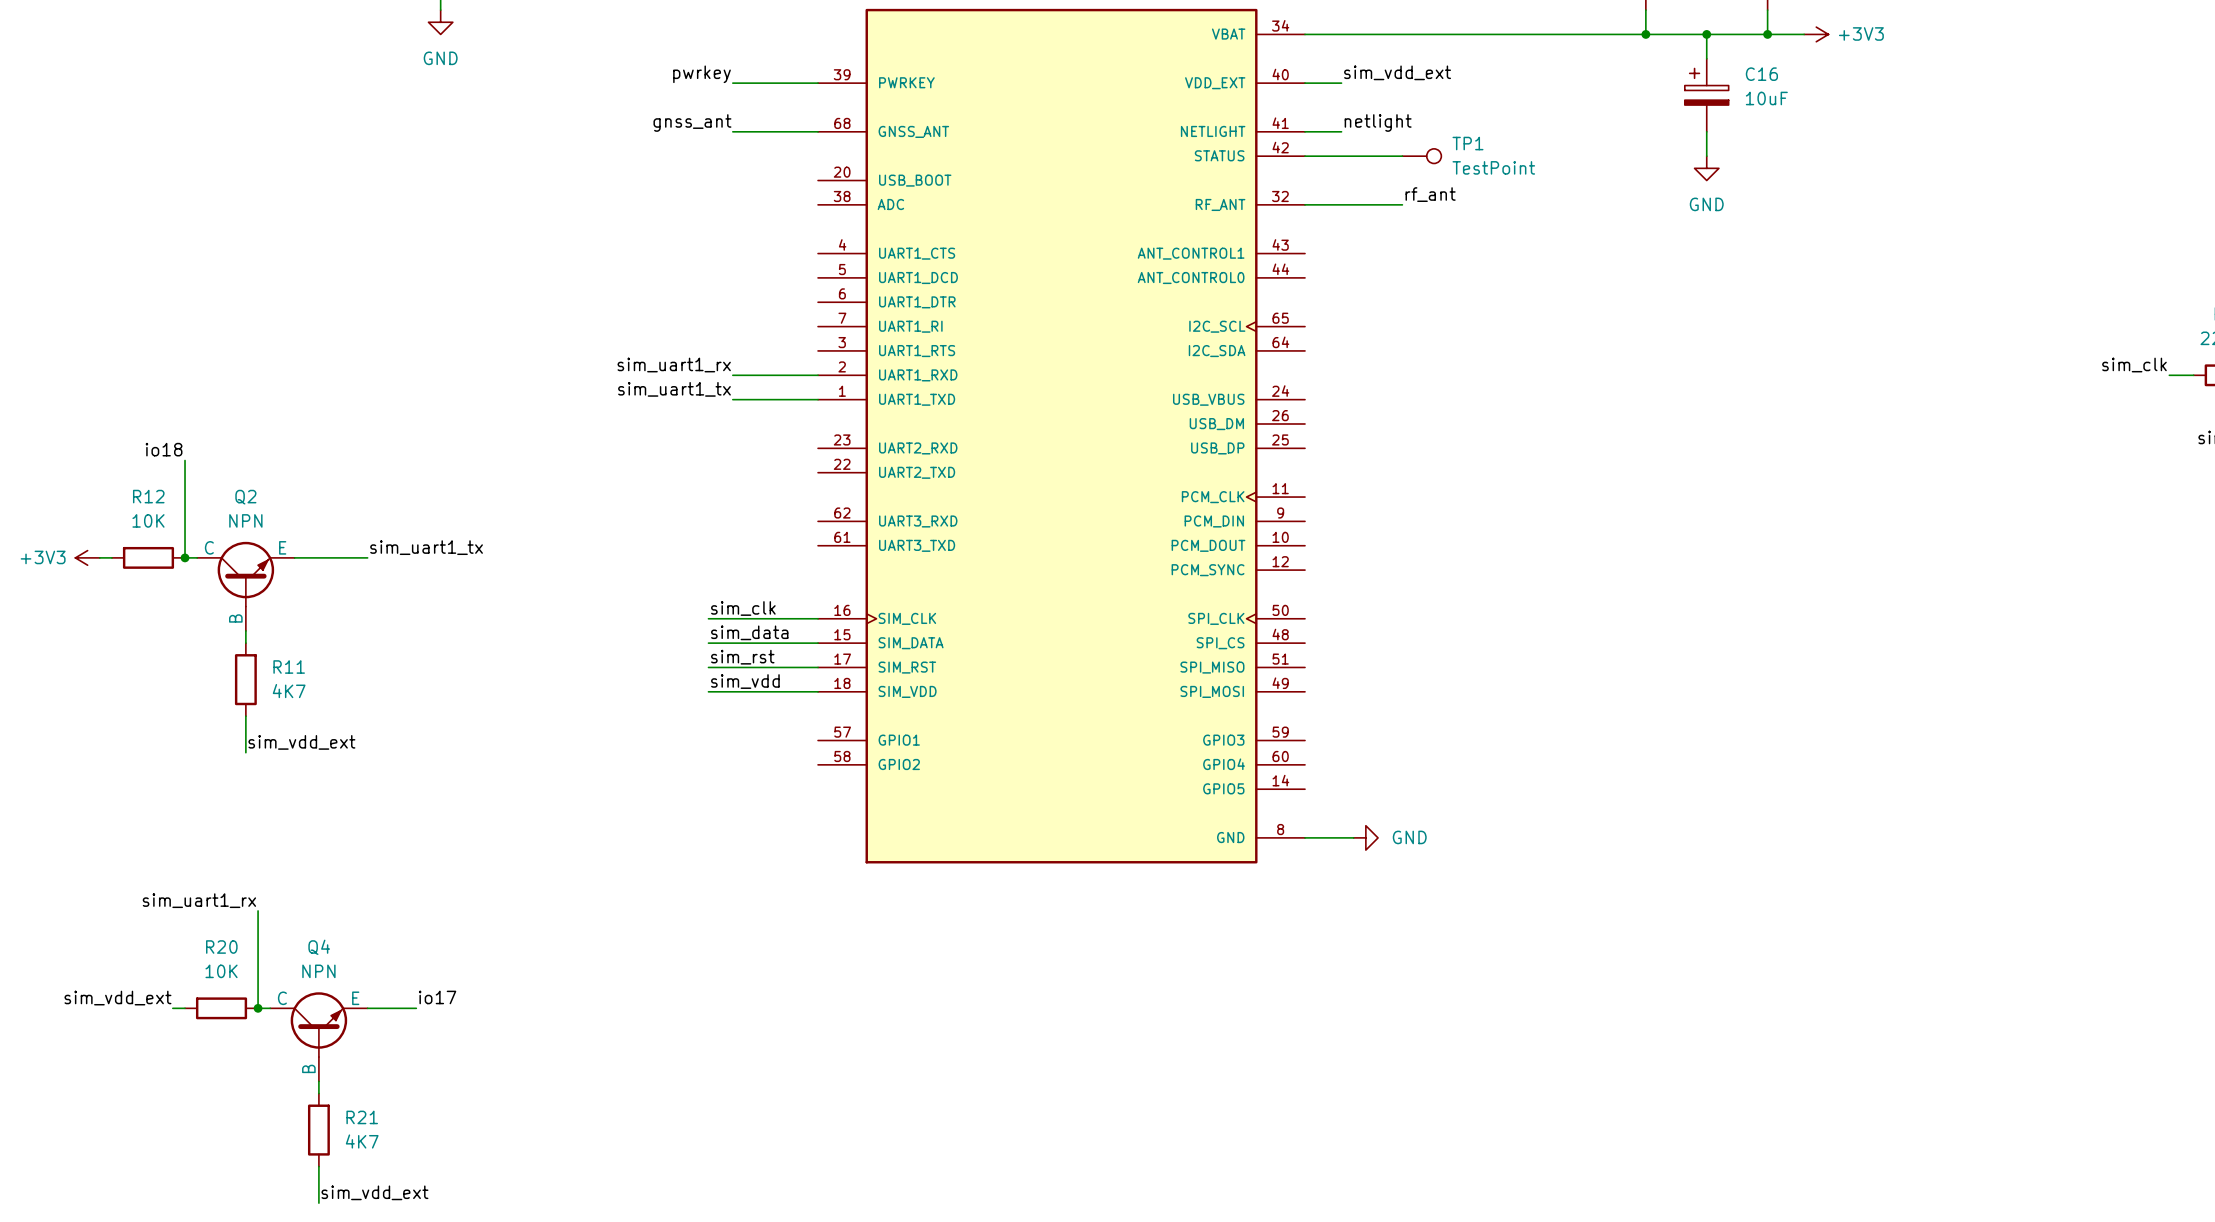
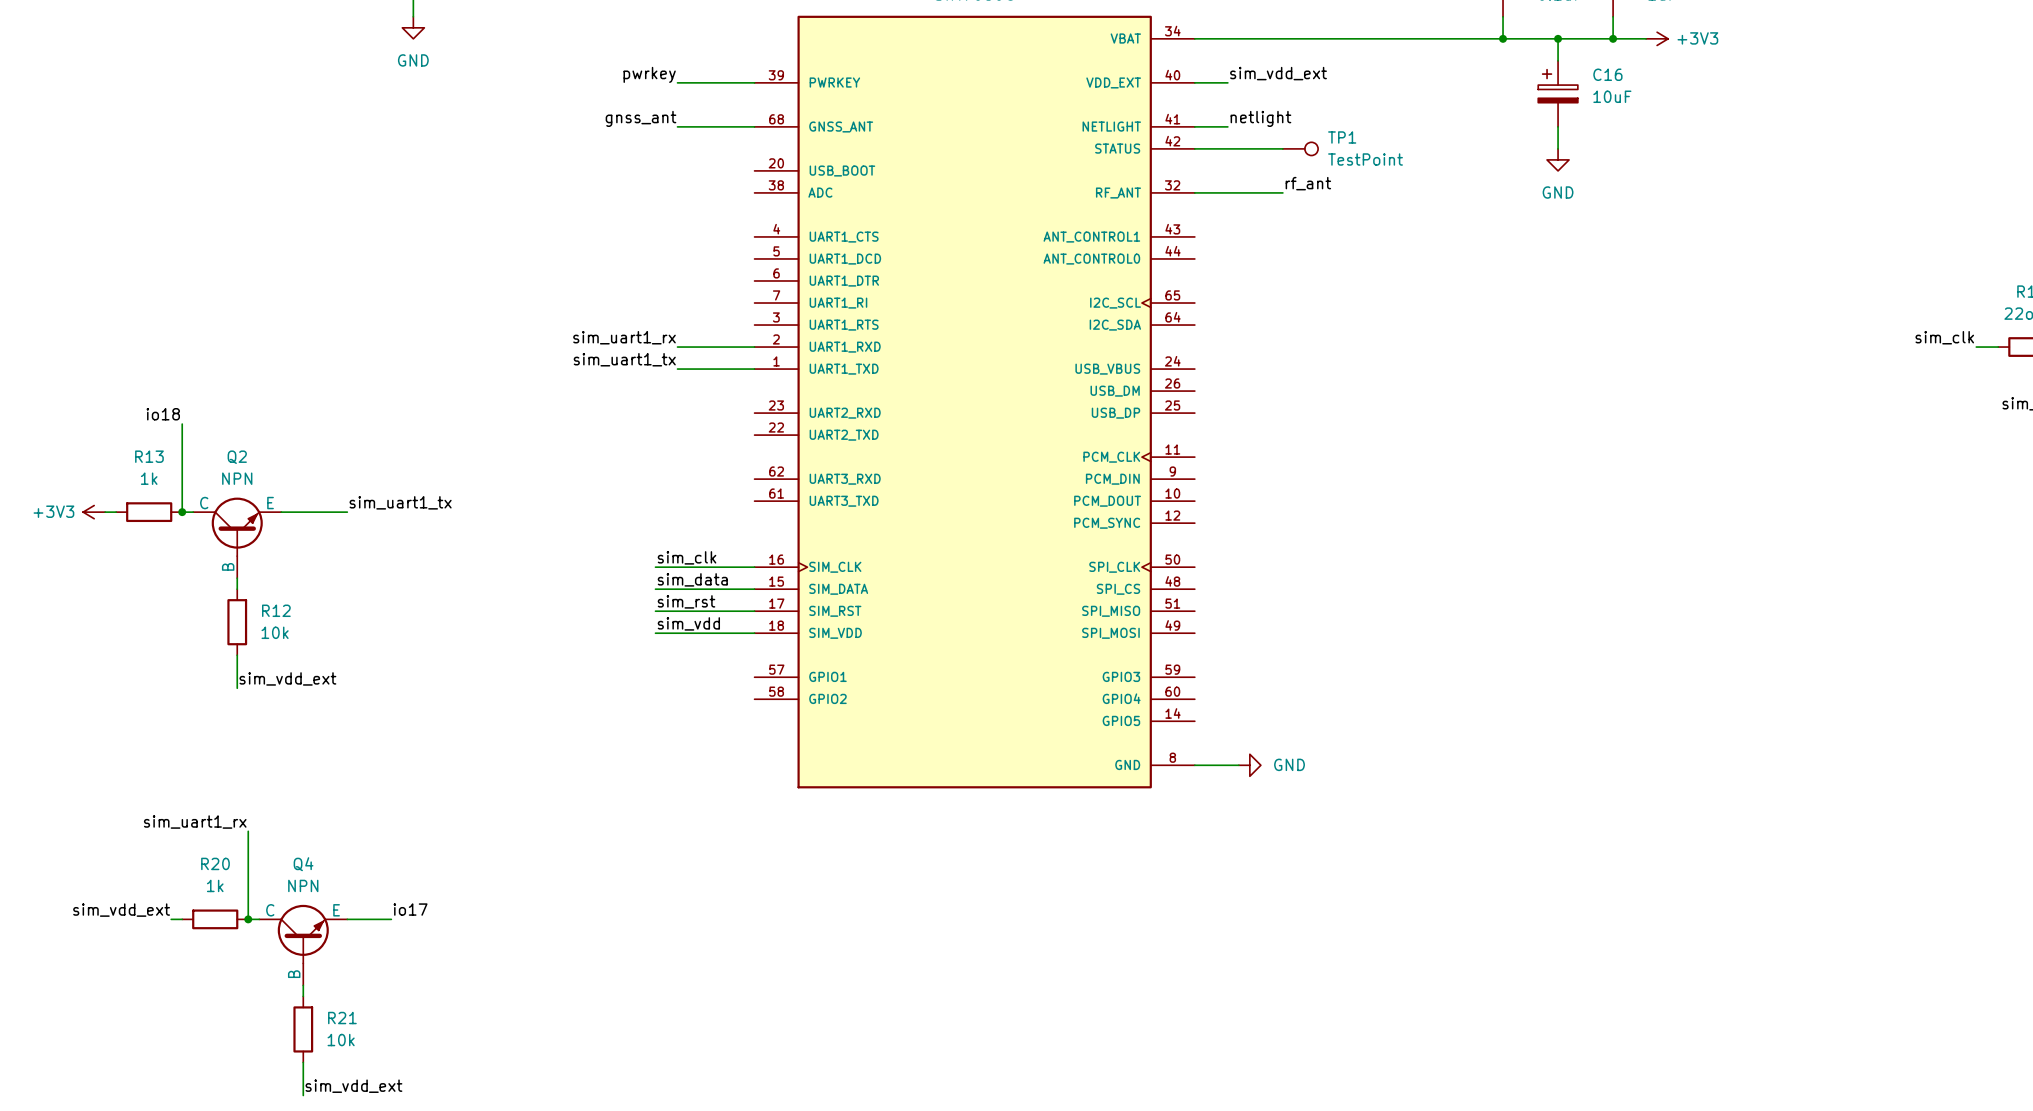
R12 name: R12 (148, 496) -> R13 (149, 456)
R12 value: 10K (148, 520) -> 1k (149, 478)
R11 name: R11 (289, 667) -> R12 (276, 610)
R11 value: 4K7 (289, 691) -> 10k (275, 632)
R20 value: 10K (221, 971) -> 1k (215, 885)
R21 value: 4K7 (362, 1141) -> 10k (341, 1040)

